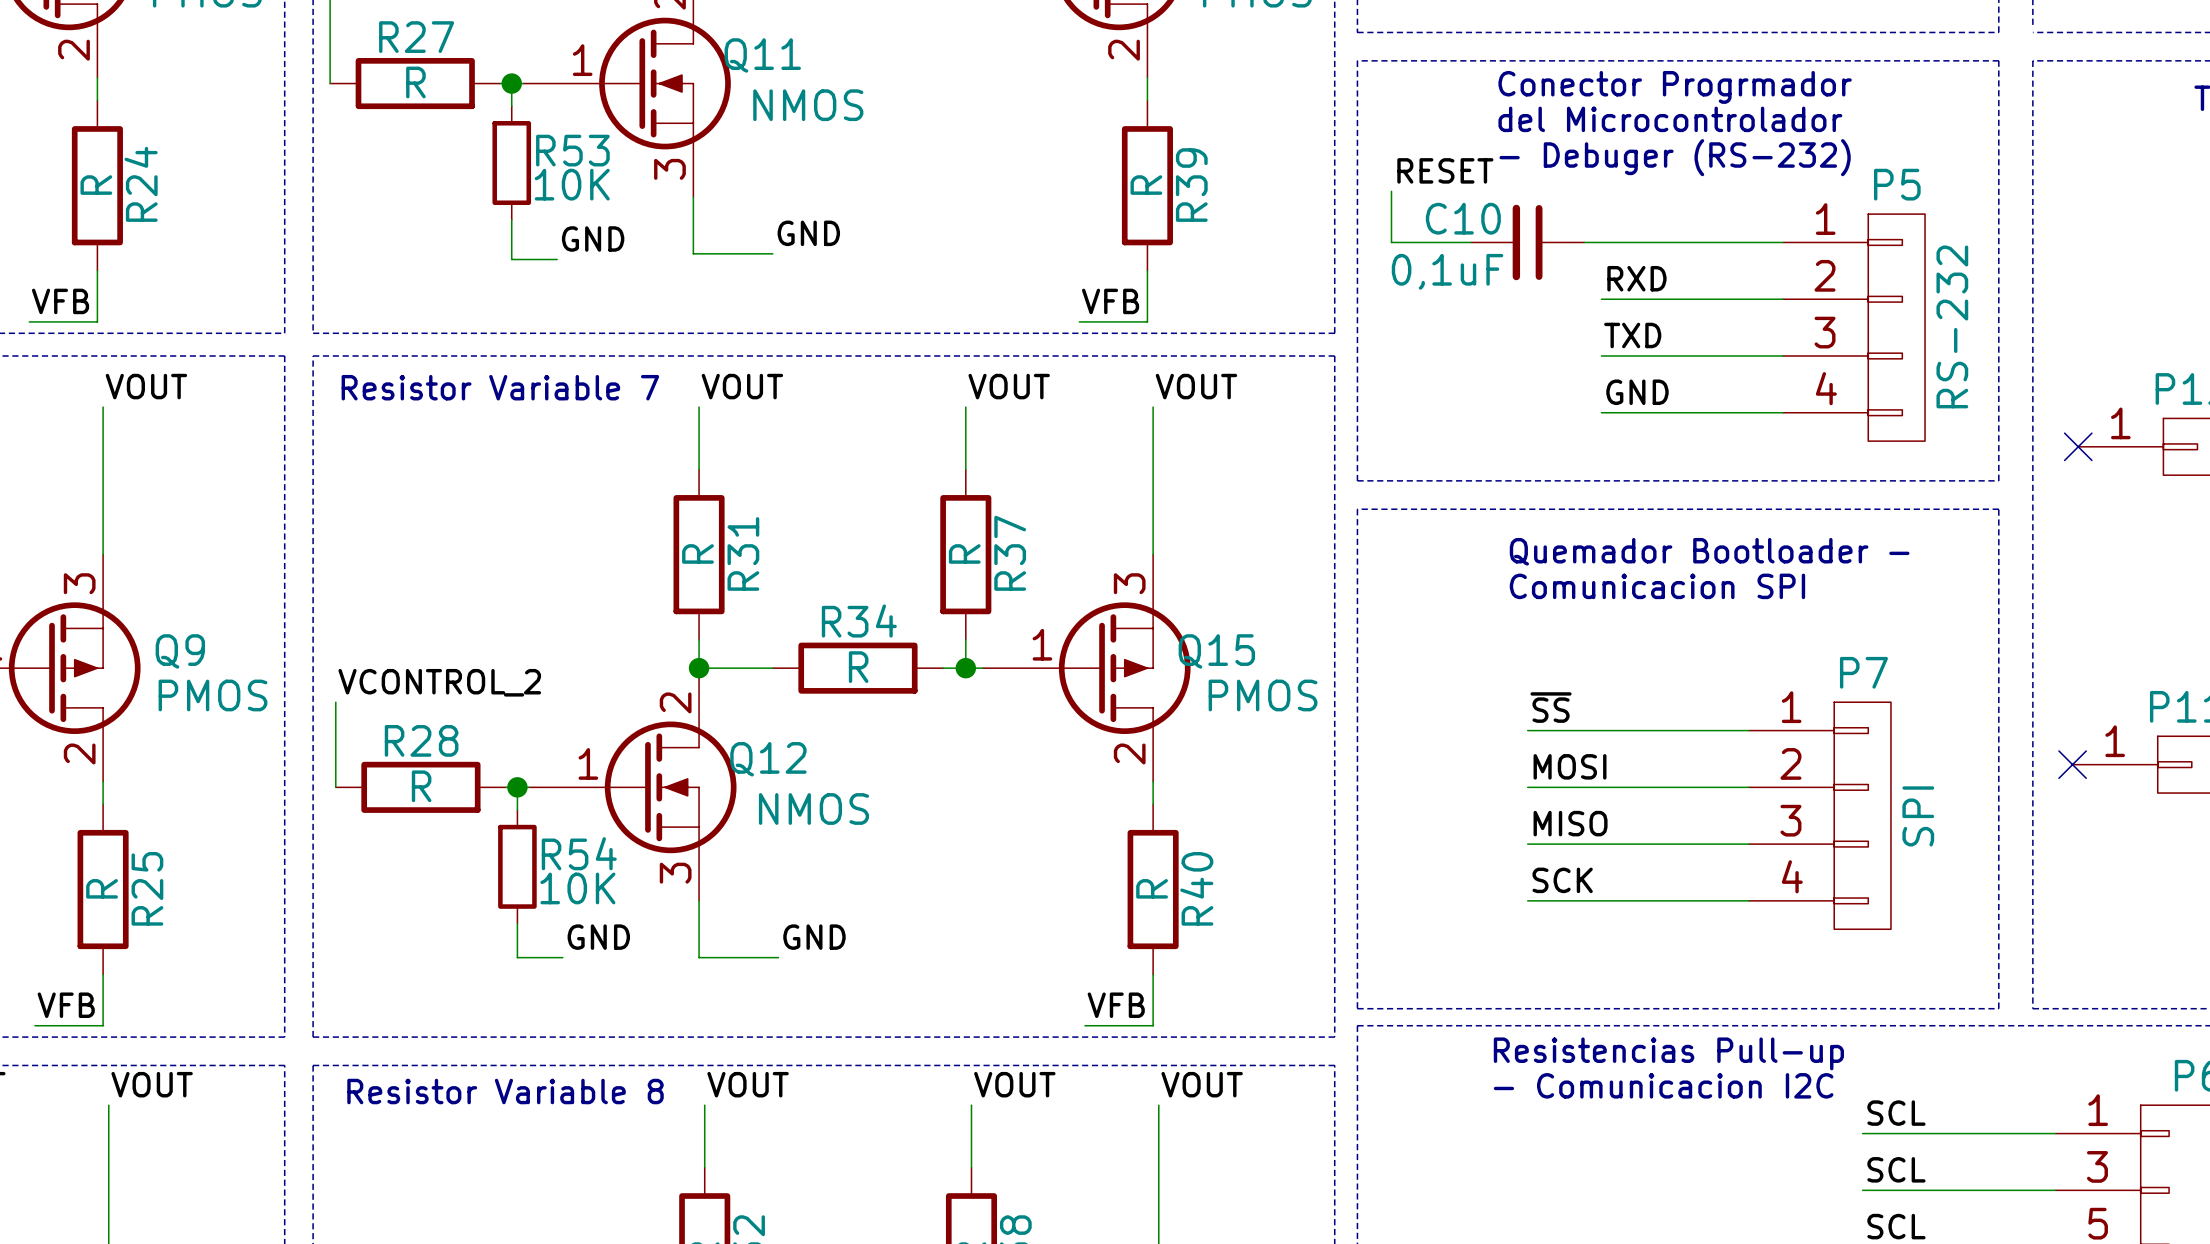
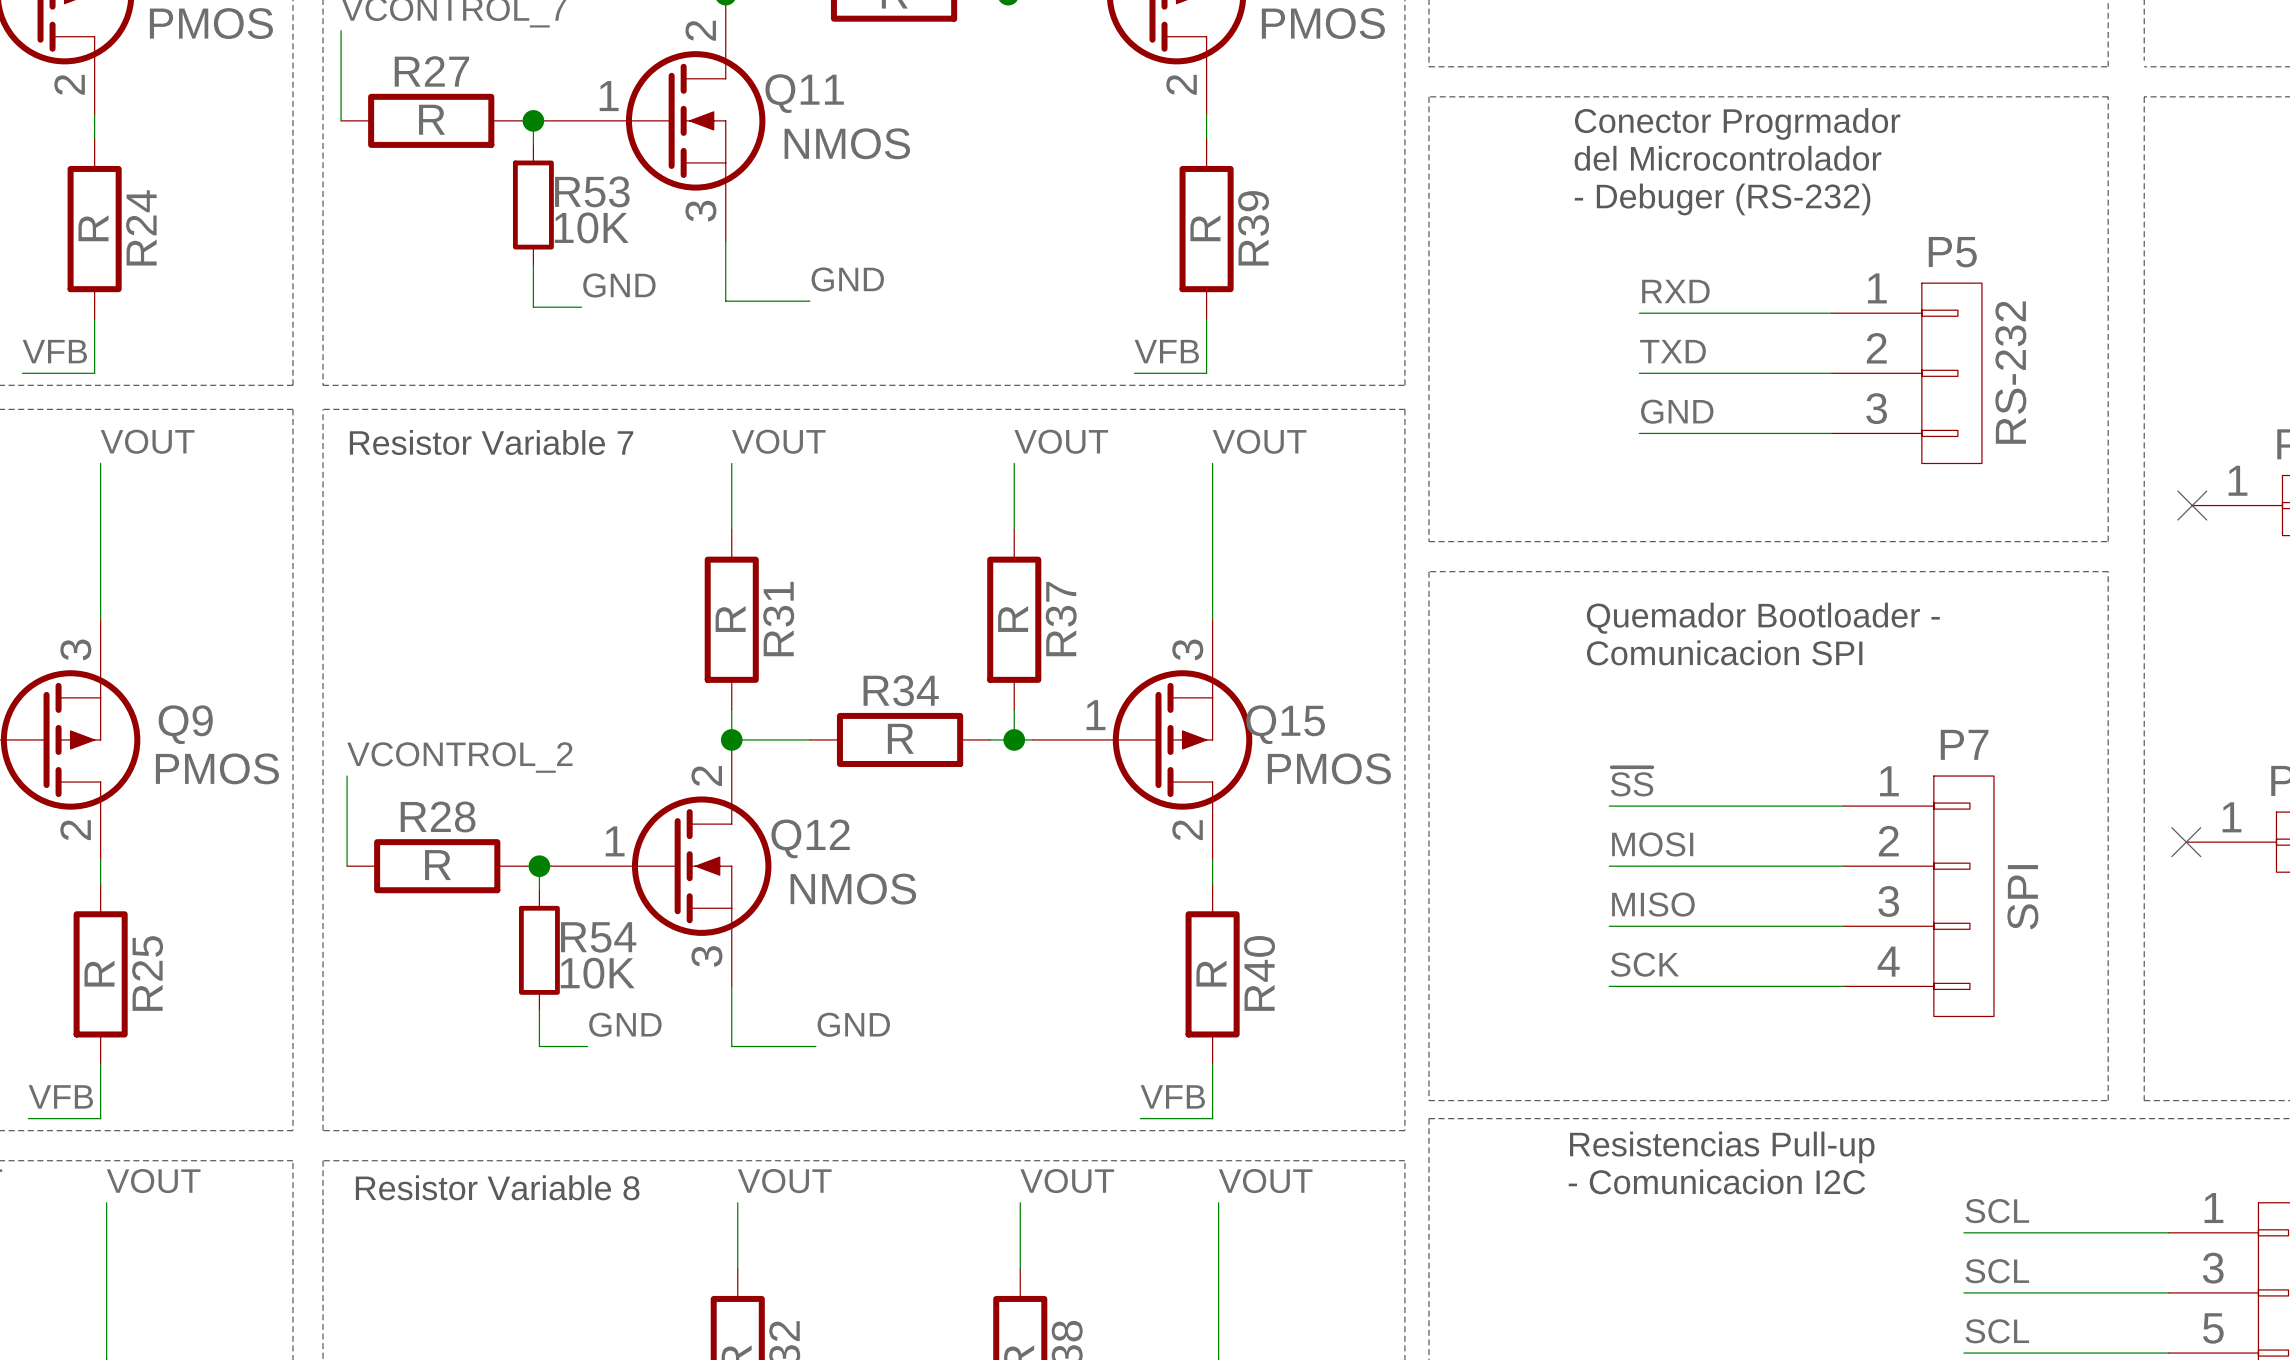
label: RESET (1445, 170) -> none
wire: (1391, 191) (1391, 242) (1470, 242) -> none
P5 symbol: [1783, 214, 1926, 442] -> [1831, 283, 1982, 464]
C10: 0,1uF (1527, 242) -> none
wire: (1584, 242) (1783, 242) -> none
label position: RXD (1636, 278) -> RXD (1675, 291)
wire: (1601, 299) (1783, 299) -> (1639, 373) (1831, 373)
label position: TXD (1632, 335) -> TXD (1672, 351)
wire: (1601, 355) (1783, 355) -> (1639, 433) (1831, 433)
label position: GND (1637, 392) -> GND (1677, 411)
wire: (1601, 412) (1783, 412) -> (1639, 313) (1831, 313)

